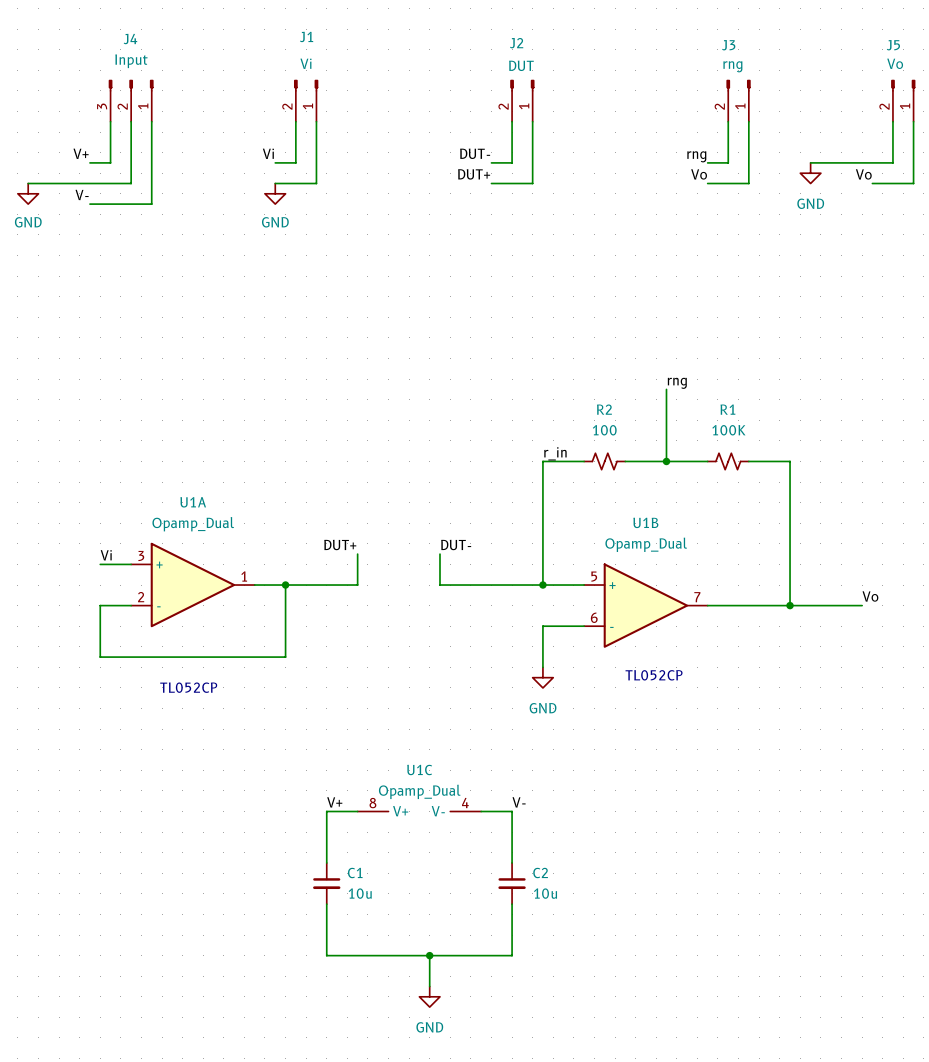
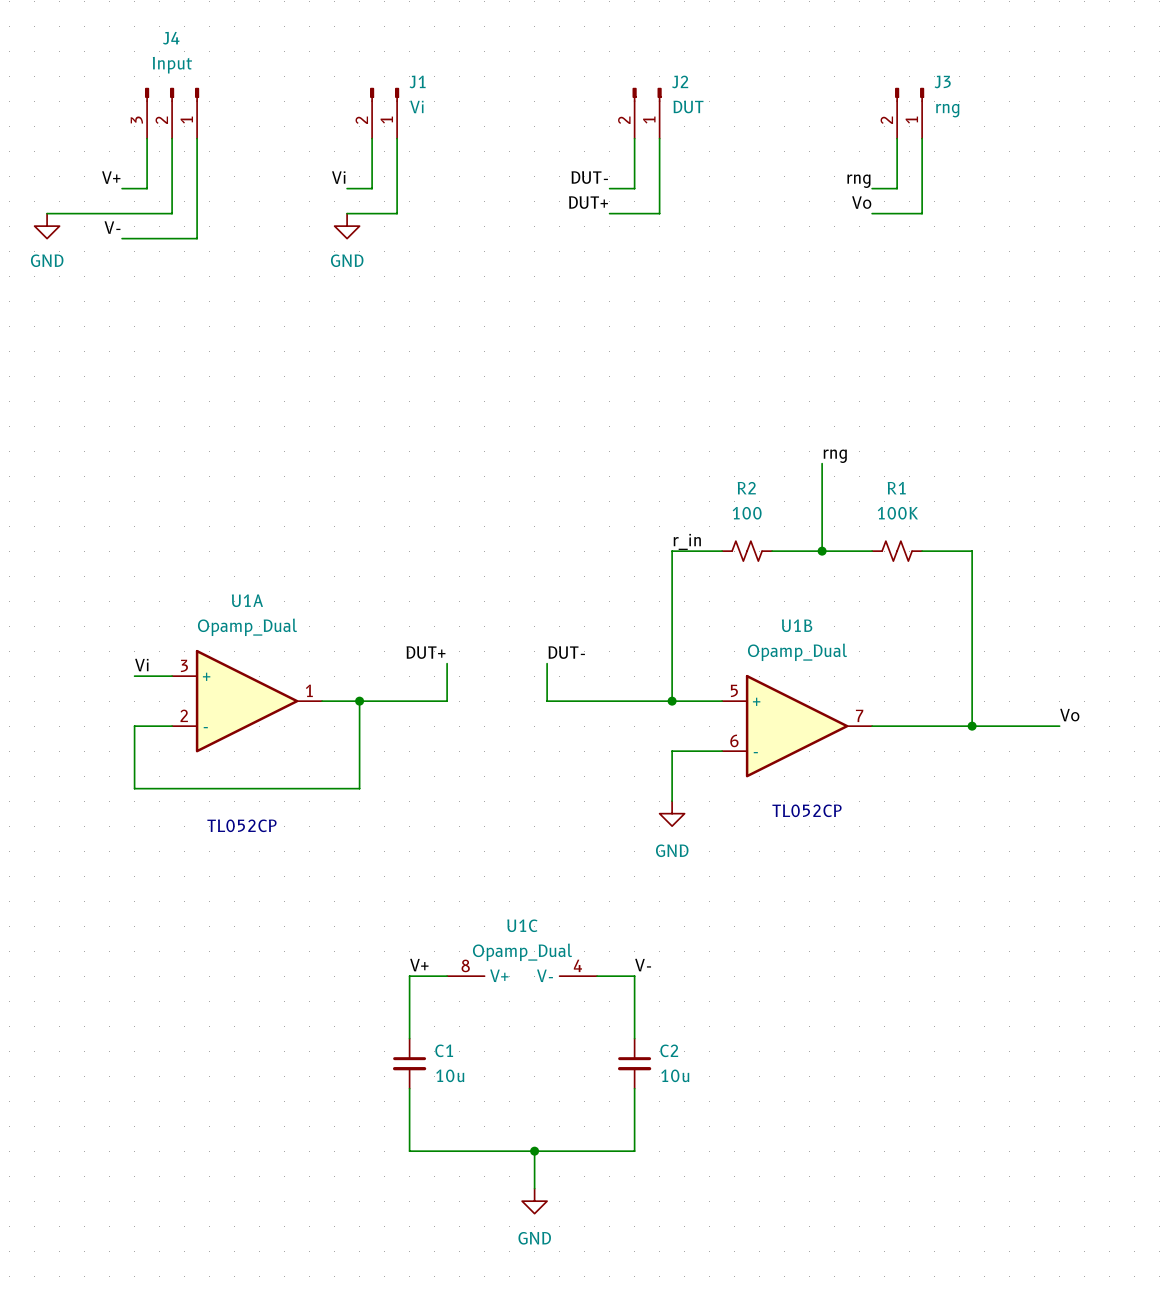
J1 name position: J1 (306, 36) -> J1 (417, 81)
J2 name position: J2 (516, 43) -> J2 (680, 81)
J3 name position: J3 (728, 45) -> J3 (942, 81)
J1 value position: Vi (305, 63) -> Vi (416, 106)
J2 value position: DUT (521, 65) -> DUT (688, 106)
J3 value position: rng (732, 66) -> rng (947, 110)
J5: Vo (903, 100) -> none
wire: (892, 121) (892, 162) (810, 162) -> none
wire: (913, 121) (913, 183) (872, 183) -> none
power symbol: GND (810, 173) -> none
label: Vo (863, 174) -> none

